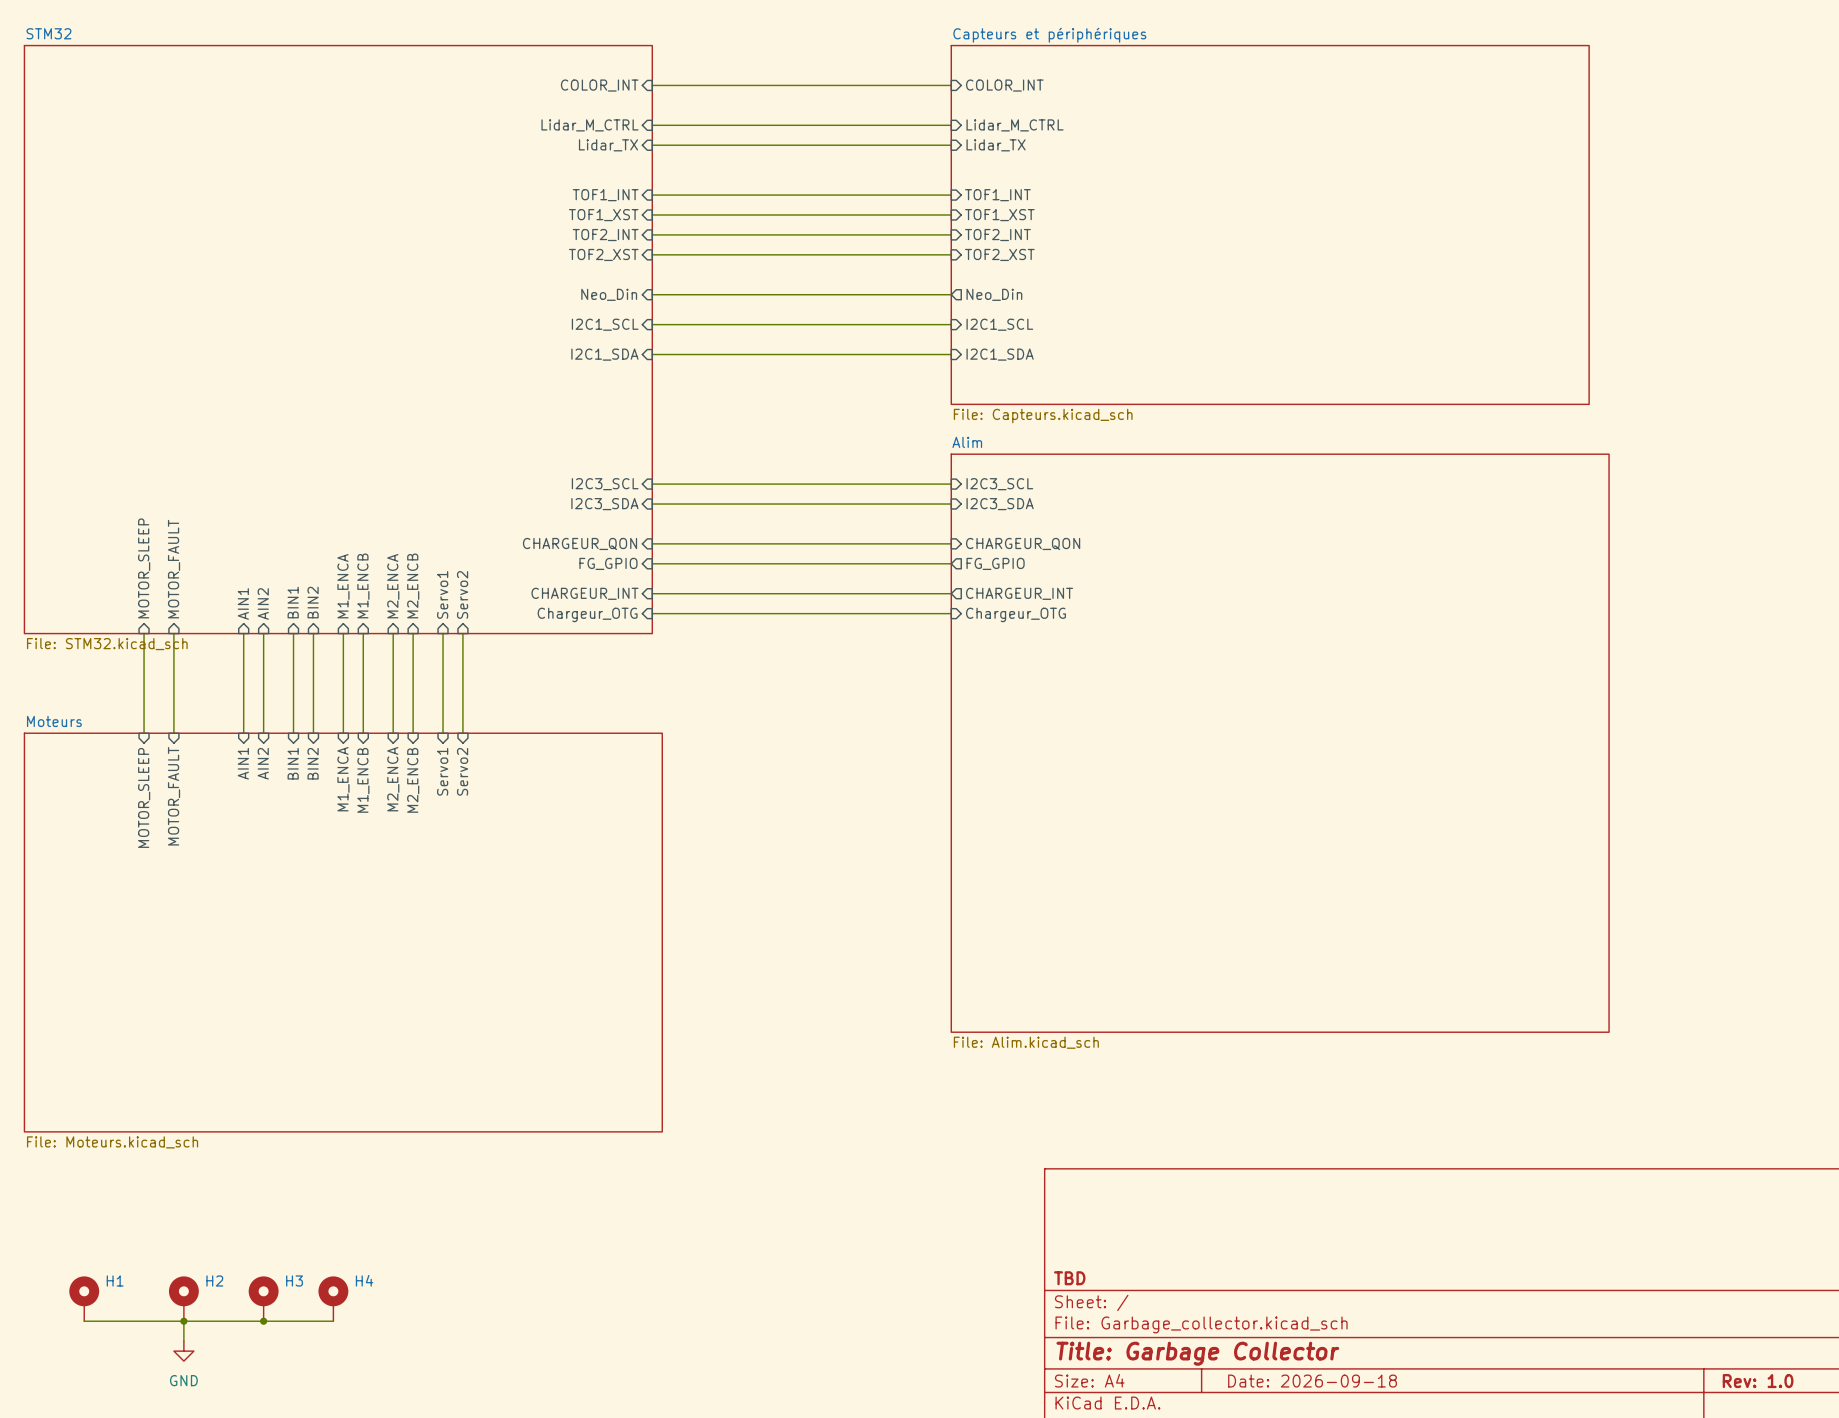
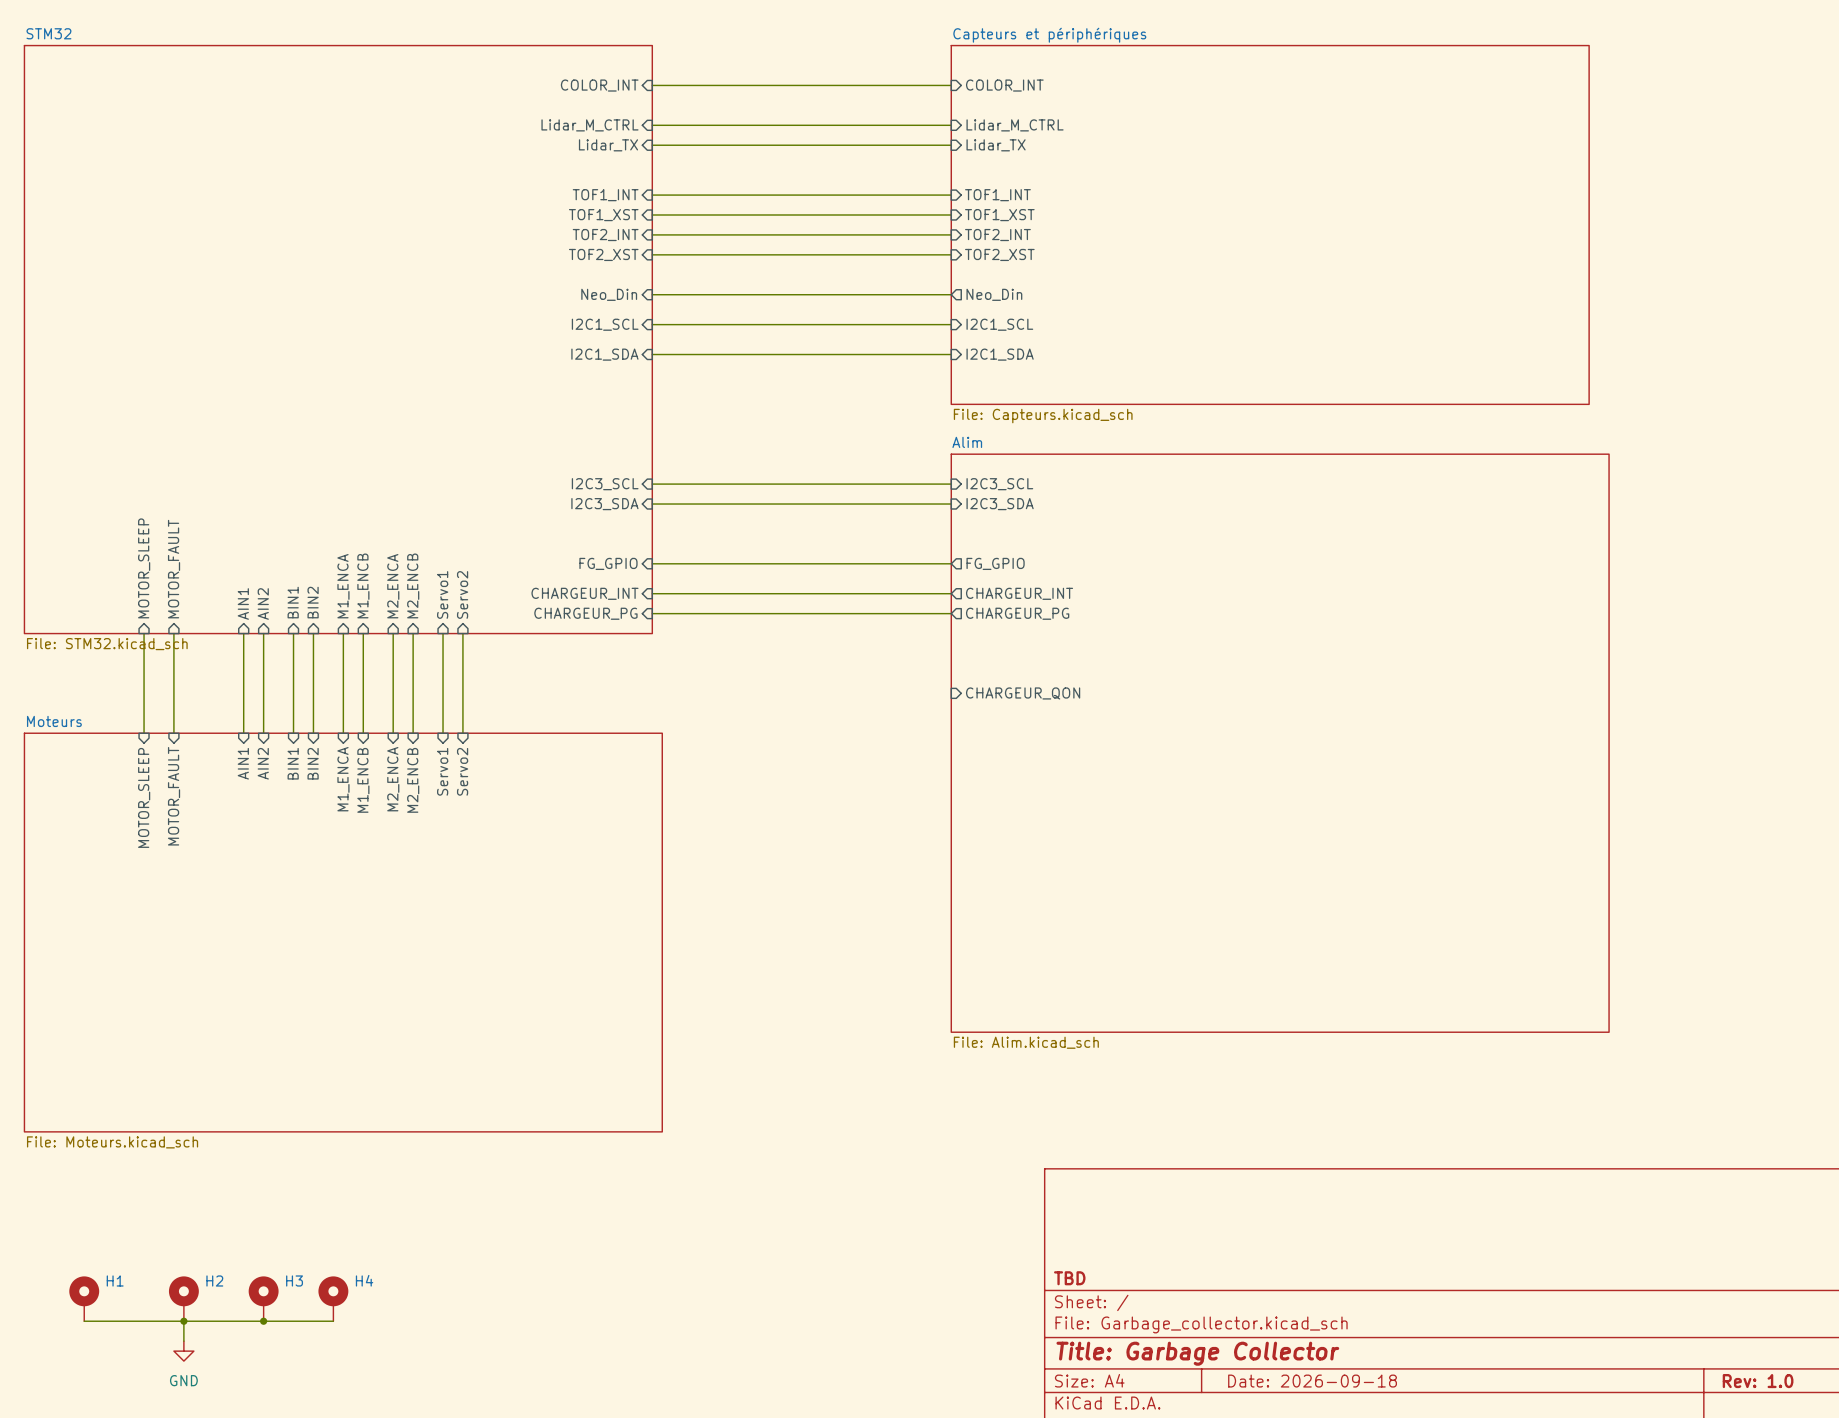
sheet pin: CHARGEUR_QON (580, 543) -> none
wire: (652, 543) (951, 543) -> none
sheet pin position: CHARGEUR_QON (1023, 543) -> CHARGEUR_QON (1023, 693)
sheet pin: Chargeur_OTG (587, 614) -> CHARGEUR_PG (585, 613)
sheet pin shape: input (1015, 614) -> output (1017, 613)
sheet pin: Chargeur_OTG (1015, 614) -> CHARGEUR_PG (1017, 613)

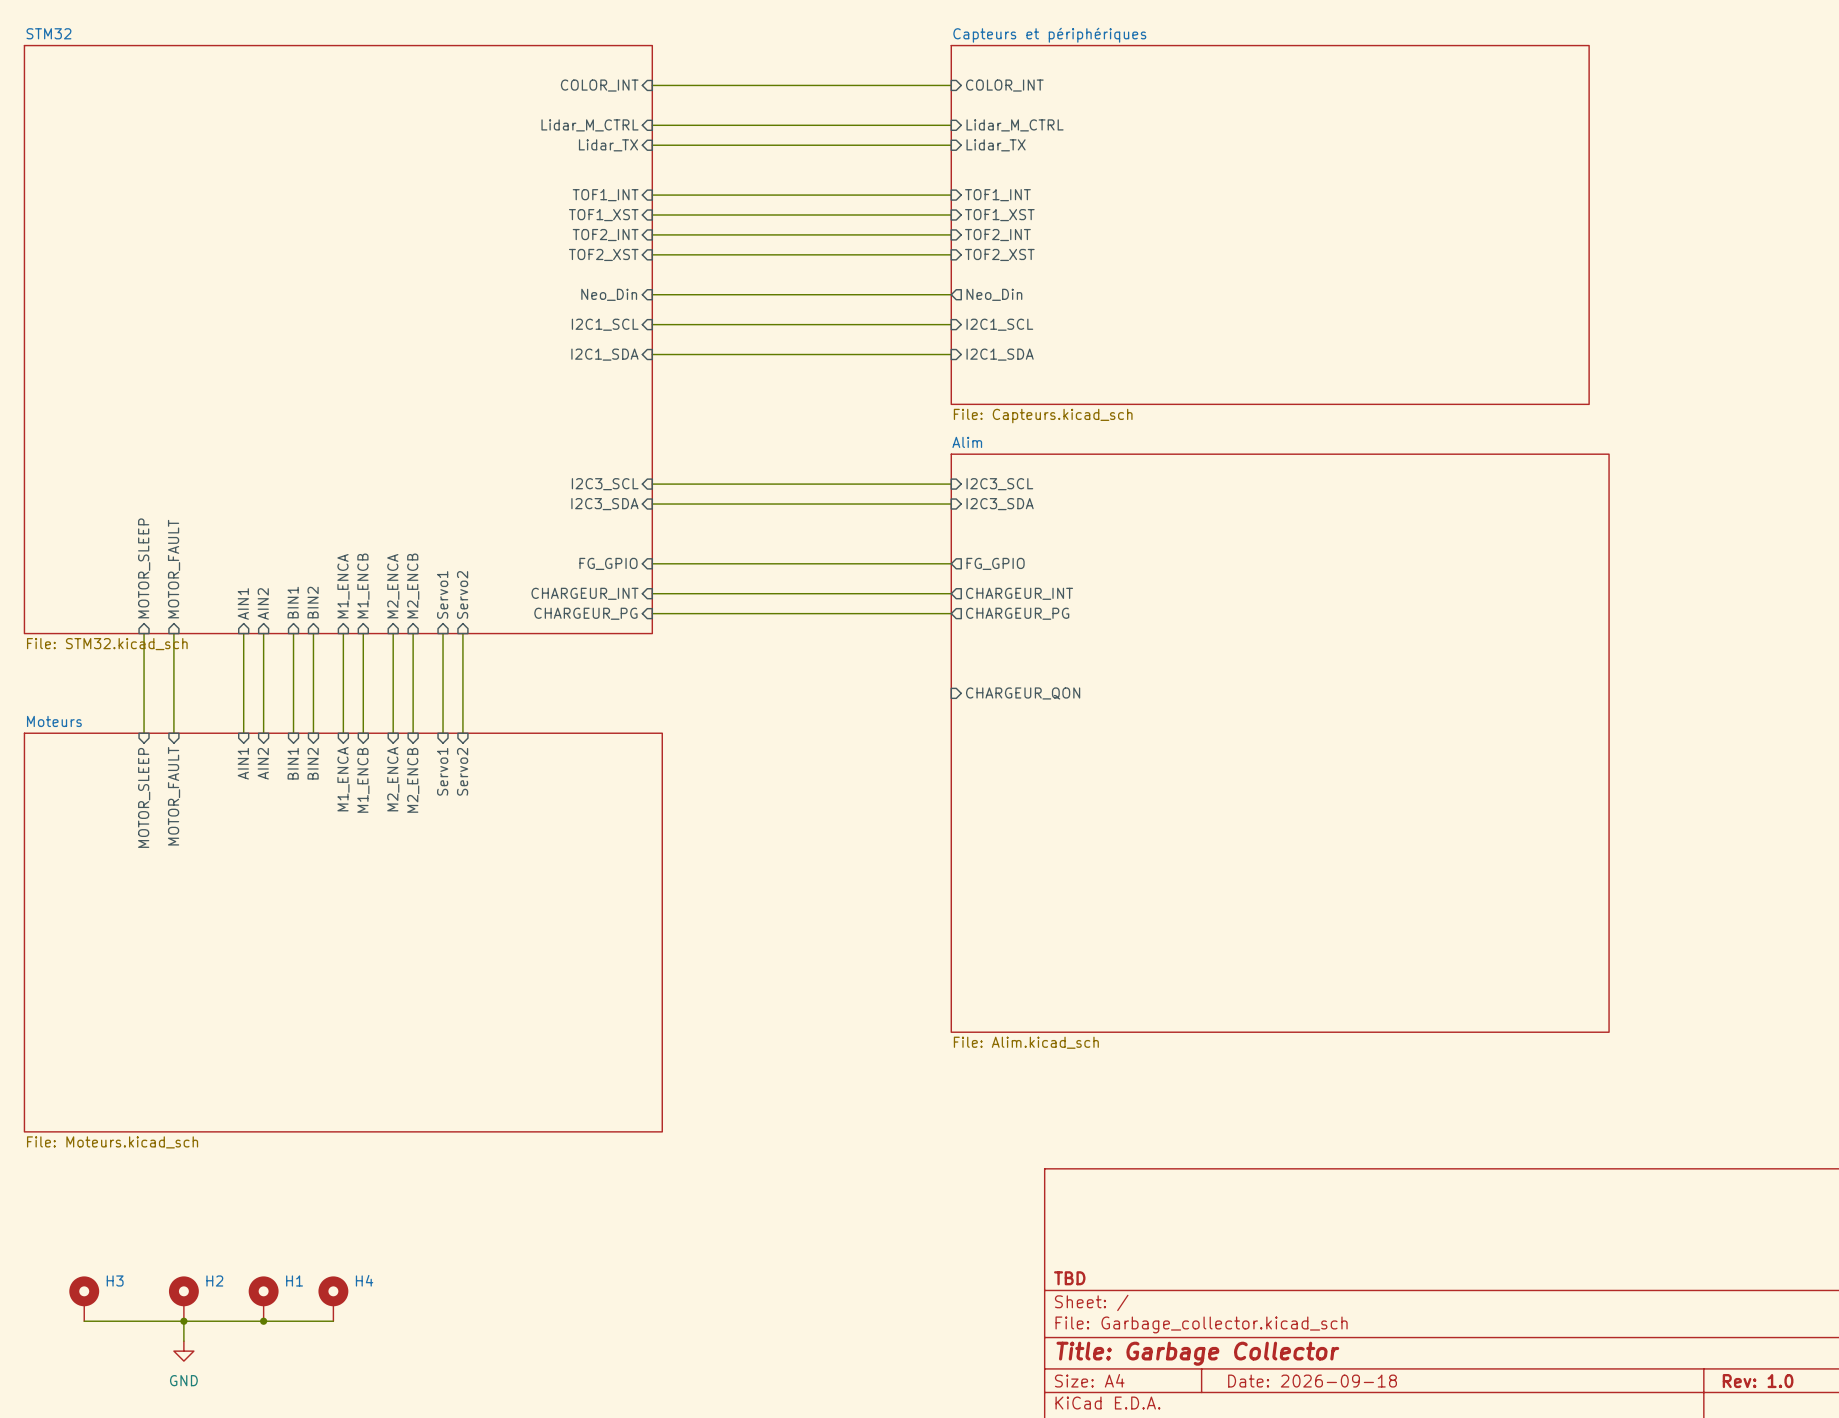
H1 name: H1 (115, 1280) -> H3 (115, 1280)
H3 name: H3 (294, 1280) -> H1 (294, 1280)

